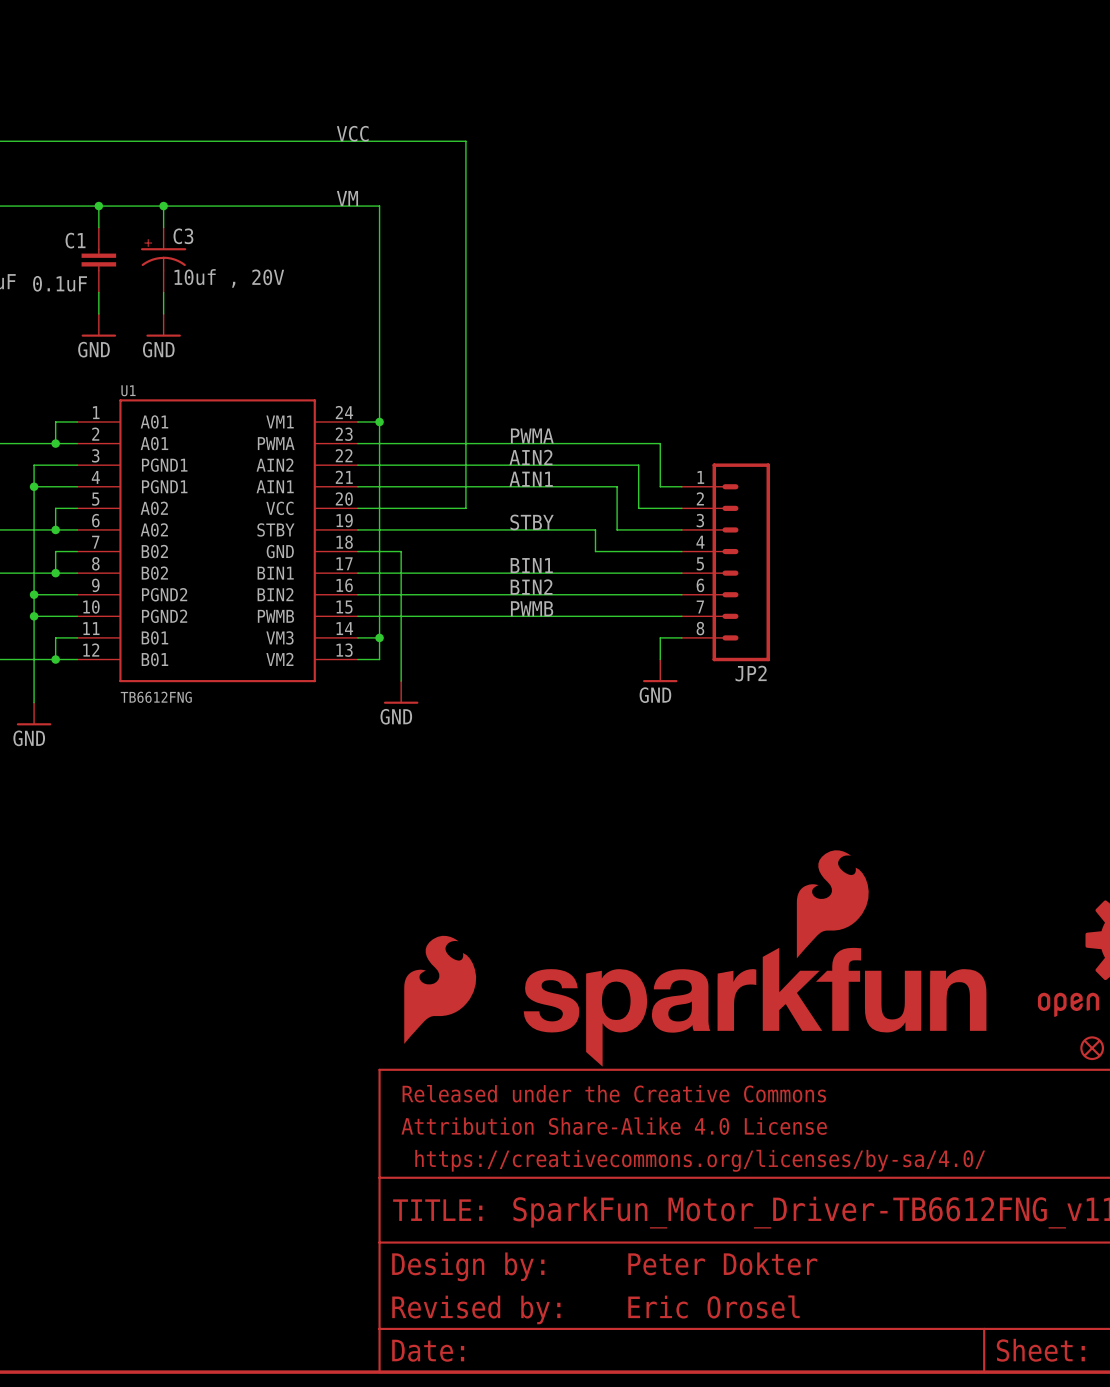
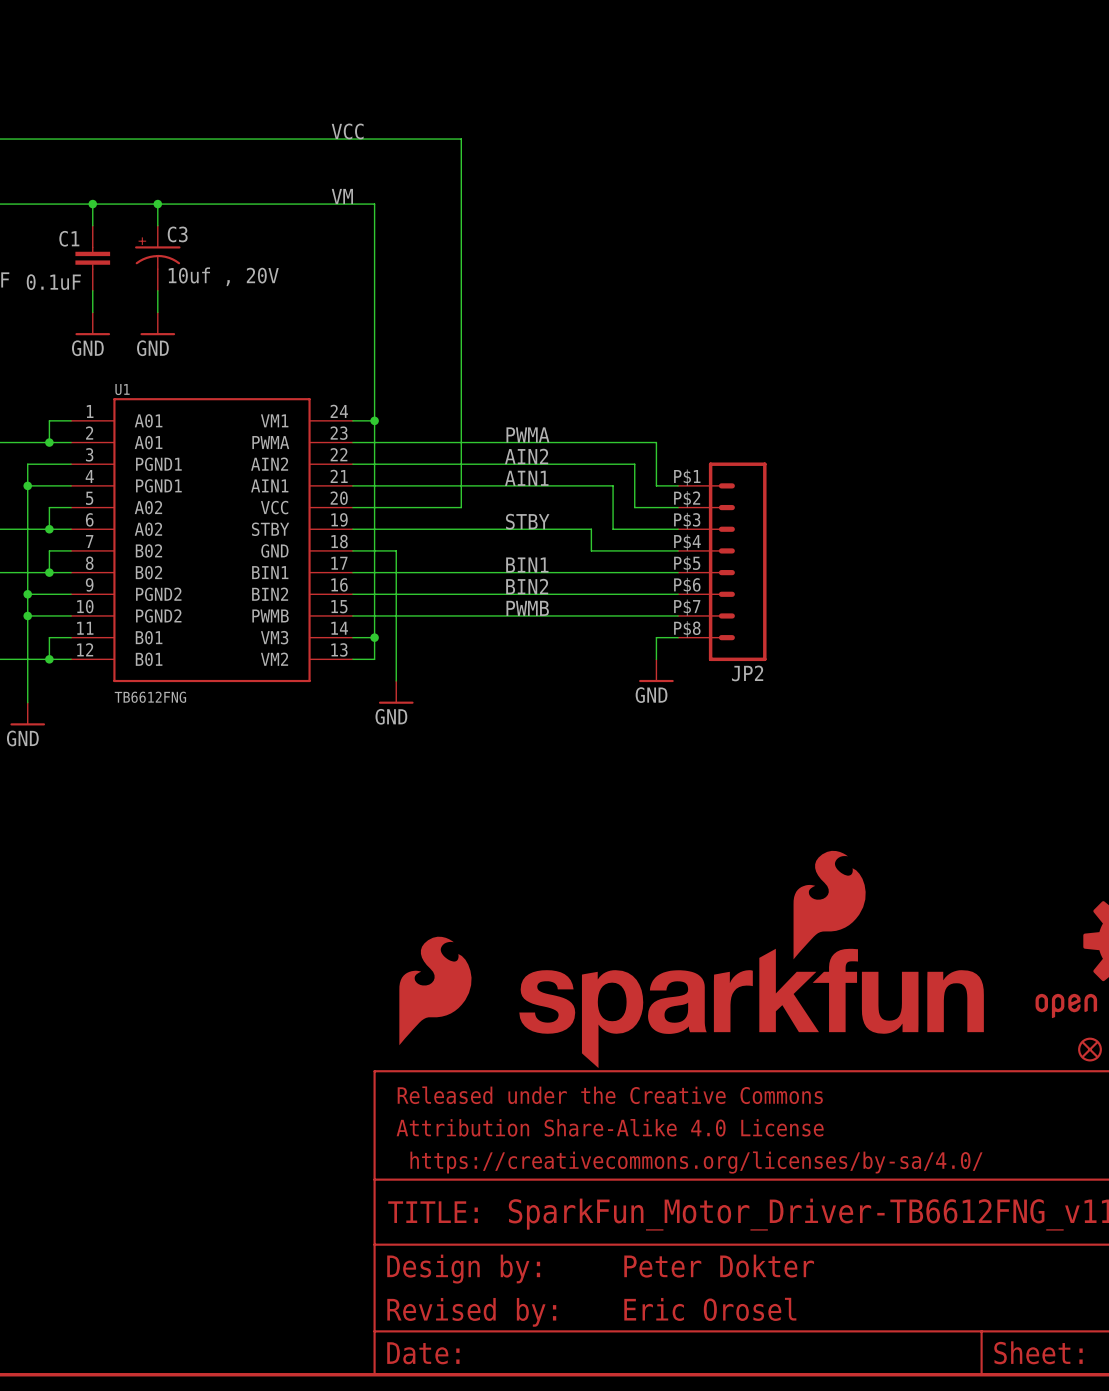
JP2 pin number: 1 (700, 477) -> P$1 (687, 477)
JP2 pin number: 2 (700, 498) -> P$2 (687, 499)
JP2 pin number: 3 (700, 520) -> P$3 (687, 520)
JP2 pin number: 4 (700, 542) -> P$4 (687, 542)
JP2 pin number: 5 (700, 563) -> P$5 (687, 564)
JP2 pin number: 6 (700, 585) -> P$6 (687, 585)
JP2 pin number: 7 (700, 606) -> P$7 (687, 607)
JP2 pin number: 8 (700, 628) -> P$8 (687, 629)

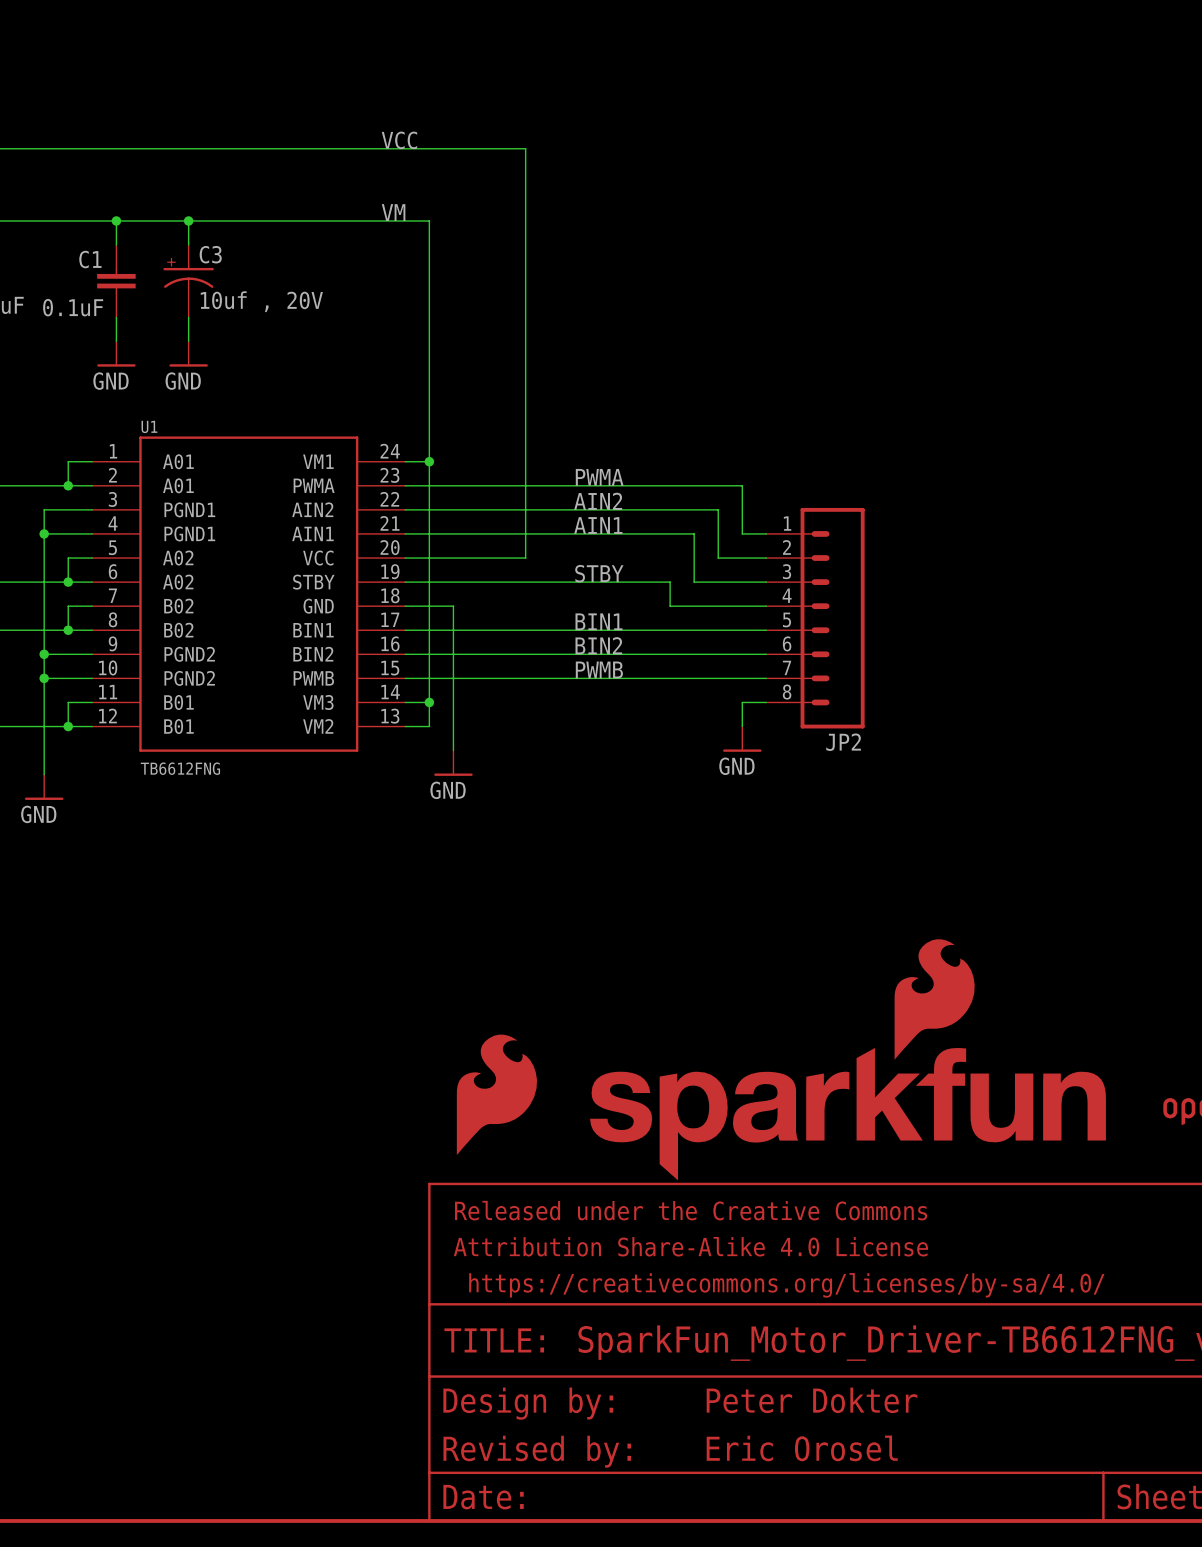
JP2 pin number: P$1 (687, 477) -> 1 (787, 523)
JP2 pin number: P$2 (687, 499) -> 2 (786, 547)
JP2 pin number: P$3 (687, 520) -> 3 (787, 571)
JP2 pin number: P$4 (687, 542) -> 4 (787, 595)
JP2 pin number: P$5 (687, 564) -> 5 (787, 619)
JP2 pin number: P$6 (687, 585) -> 6 (787, 643)
JP2 pin number: P$7 (687, 607) -> 7 (787, 667)
JP2 pin number: P$8 (687, 629) -> 8 (787, 692)

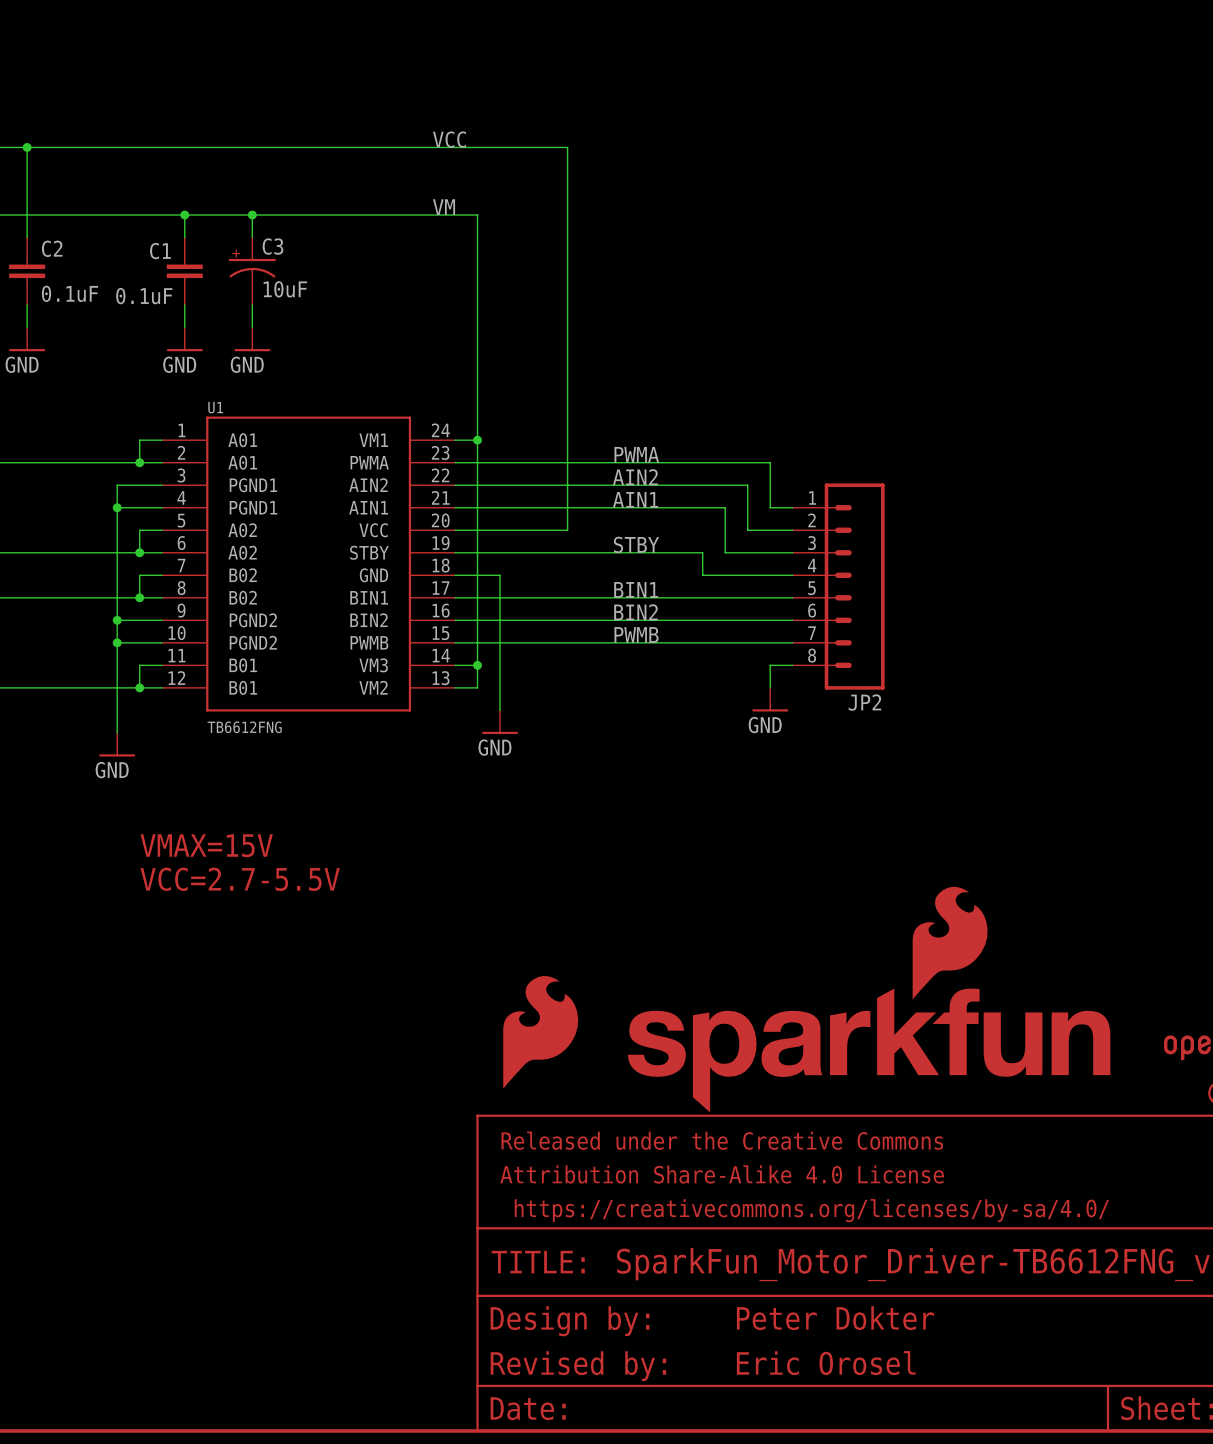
C3 value: 10uf , 20V (261, 301) -> 10uF (285, 289)
text: none -> VMAX=15V (206, 845)
text: none -> VCC=2.7-5.5V (240, 879)

